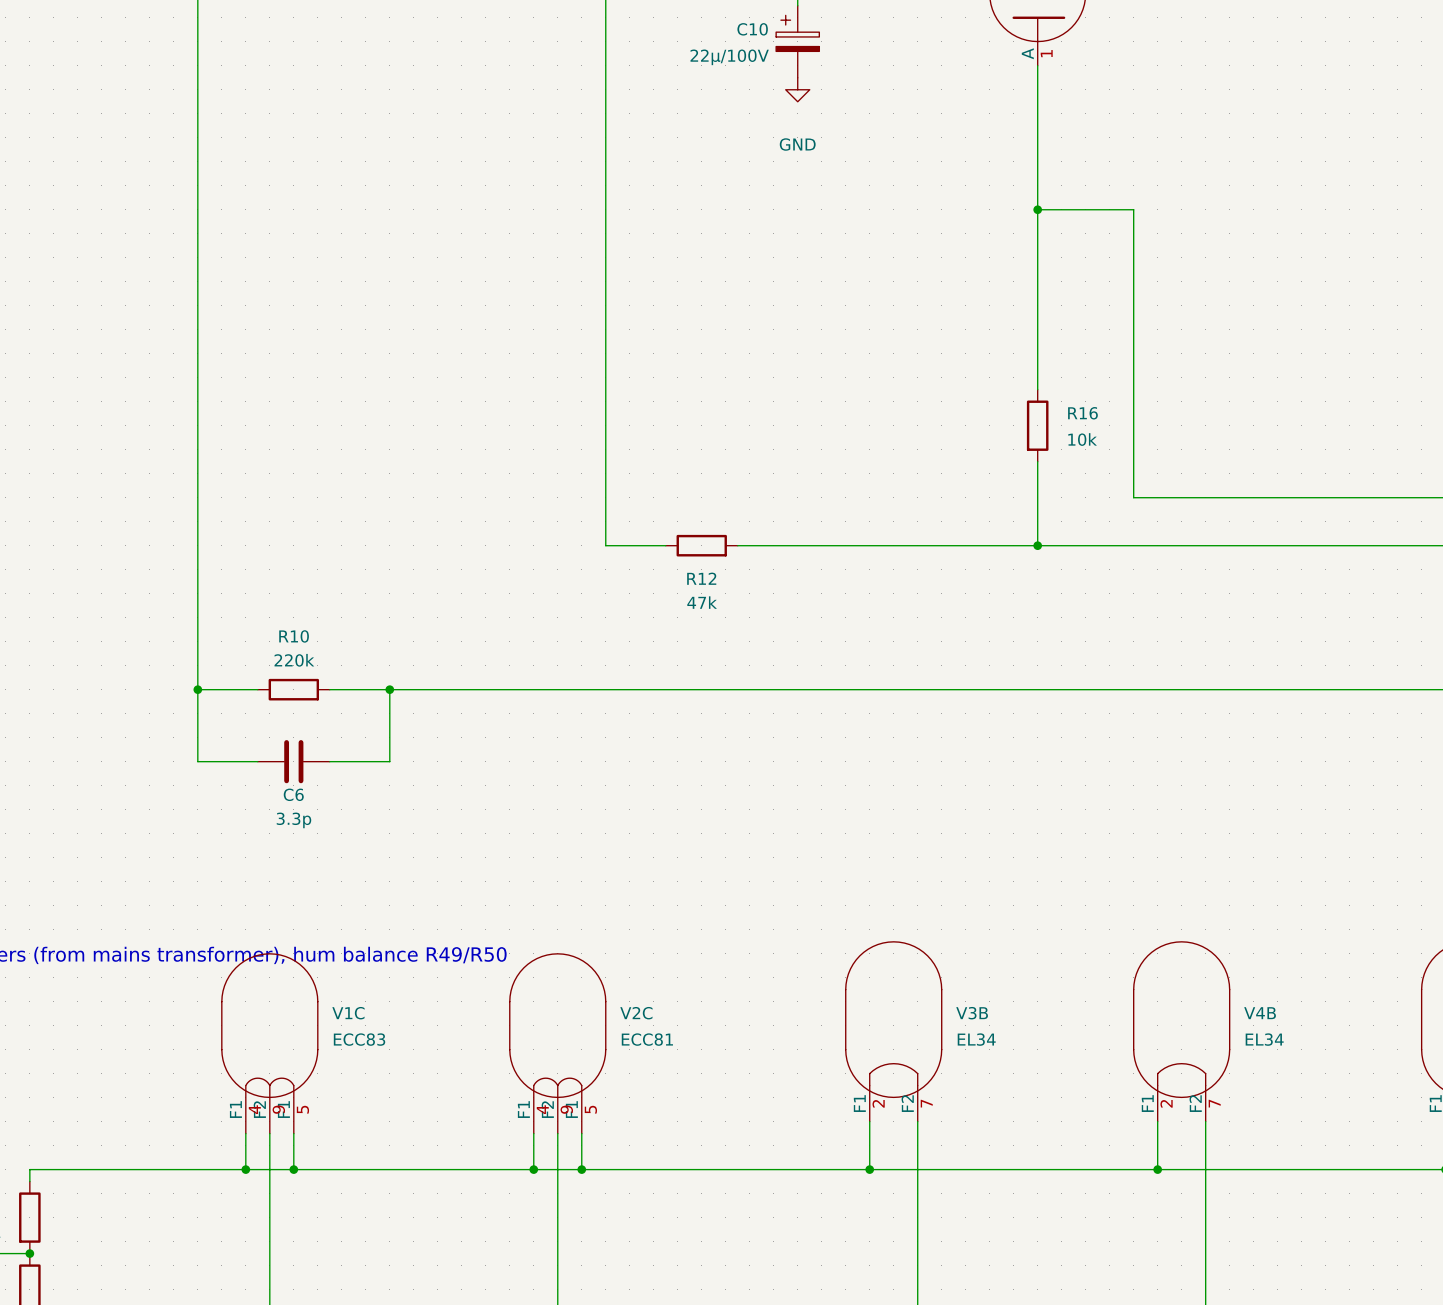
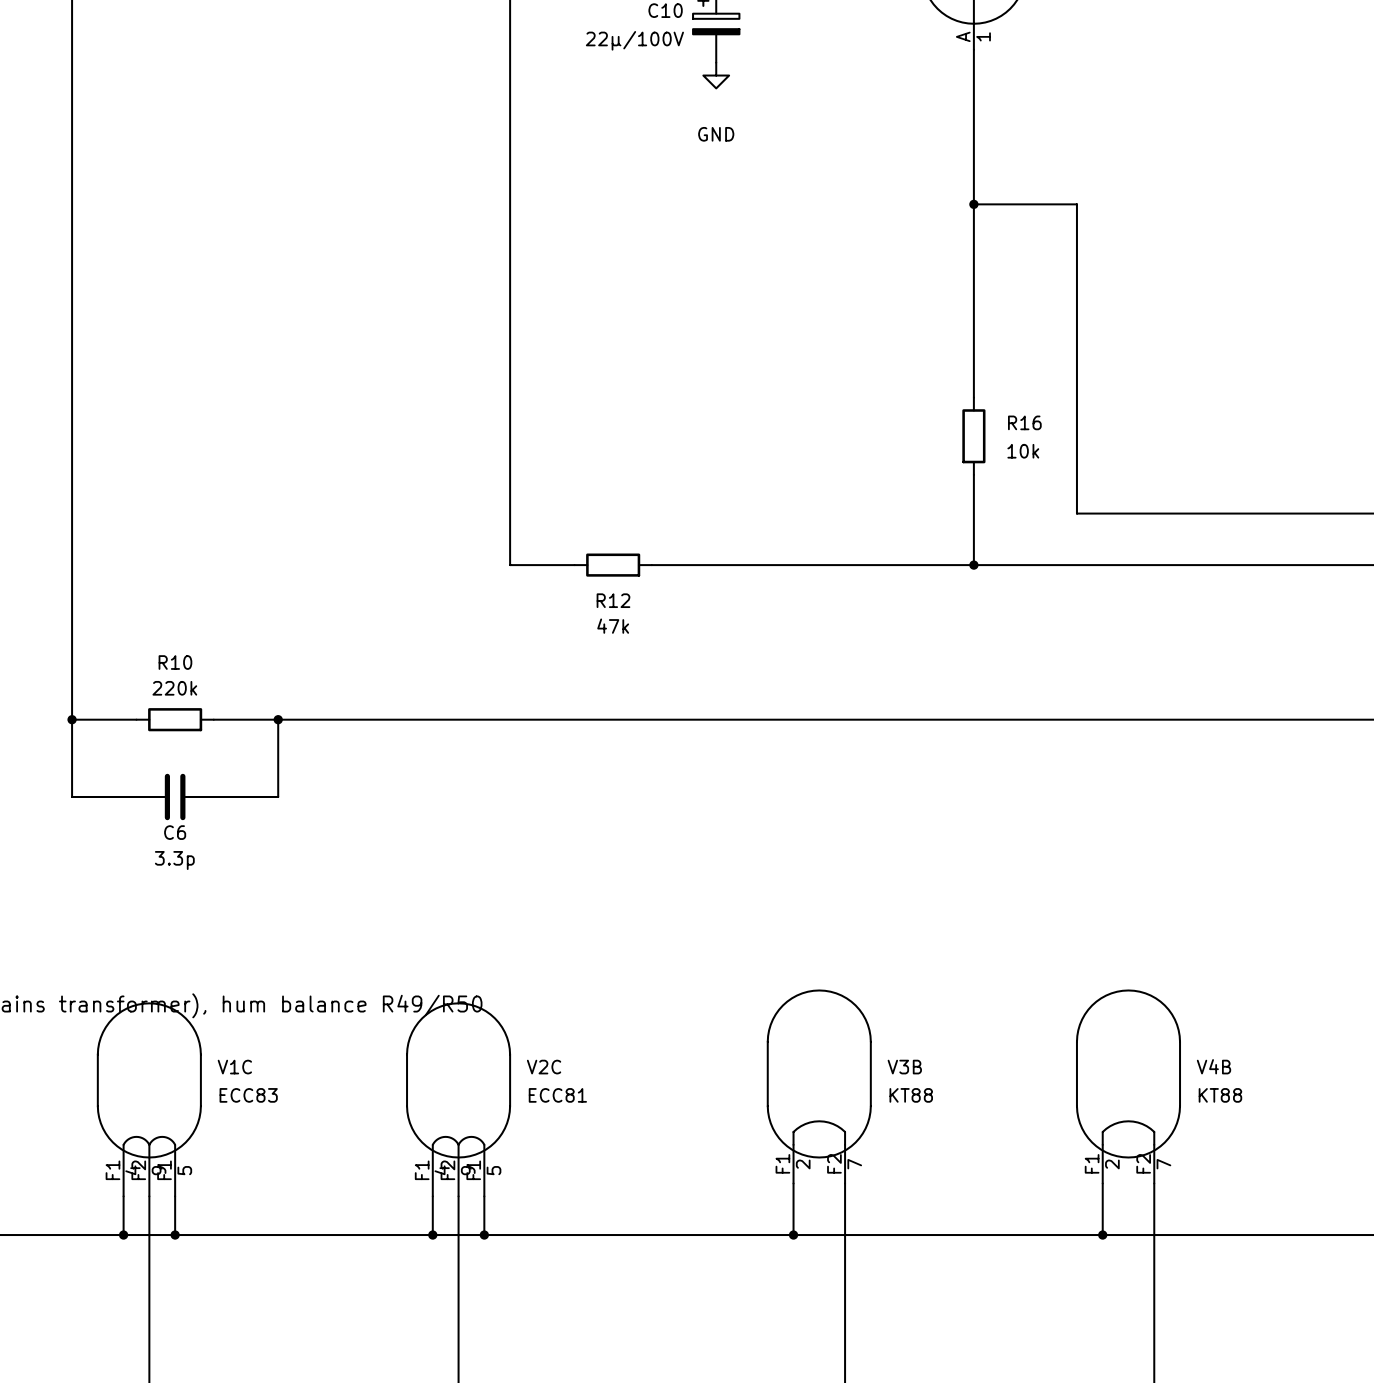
V3B value: EL34 (976, 1039) -> KT88 (911, 1095)
V4B value: EL34 (1264, 1039) -> KT88 (1220, 1095)

